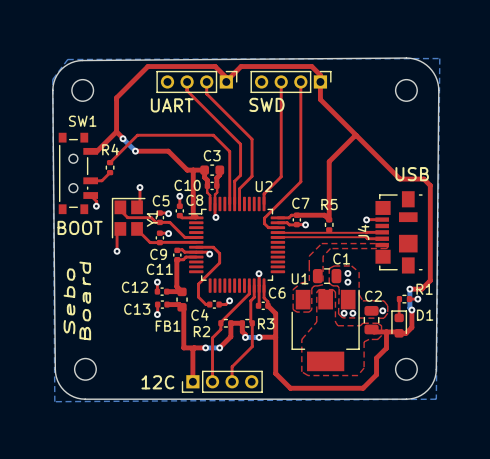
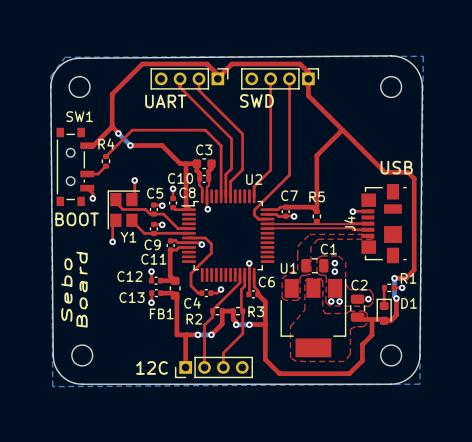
Y1 name rotation: 0° (152, 218) -> 90° clockwise (128, 237)
Y1 name position: Y1 (152, 218) -> Y1 (128, 237)

